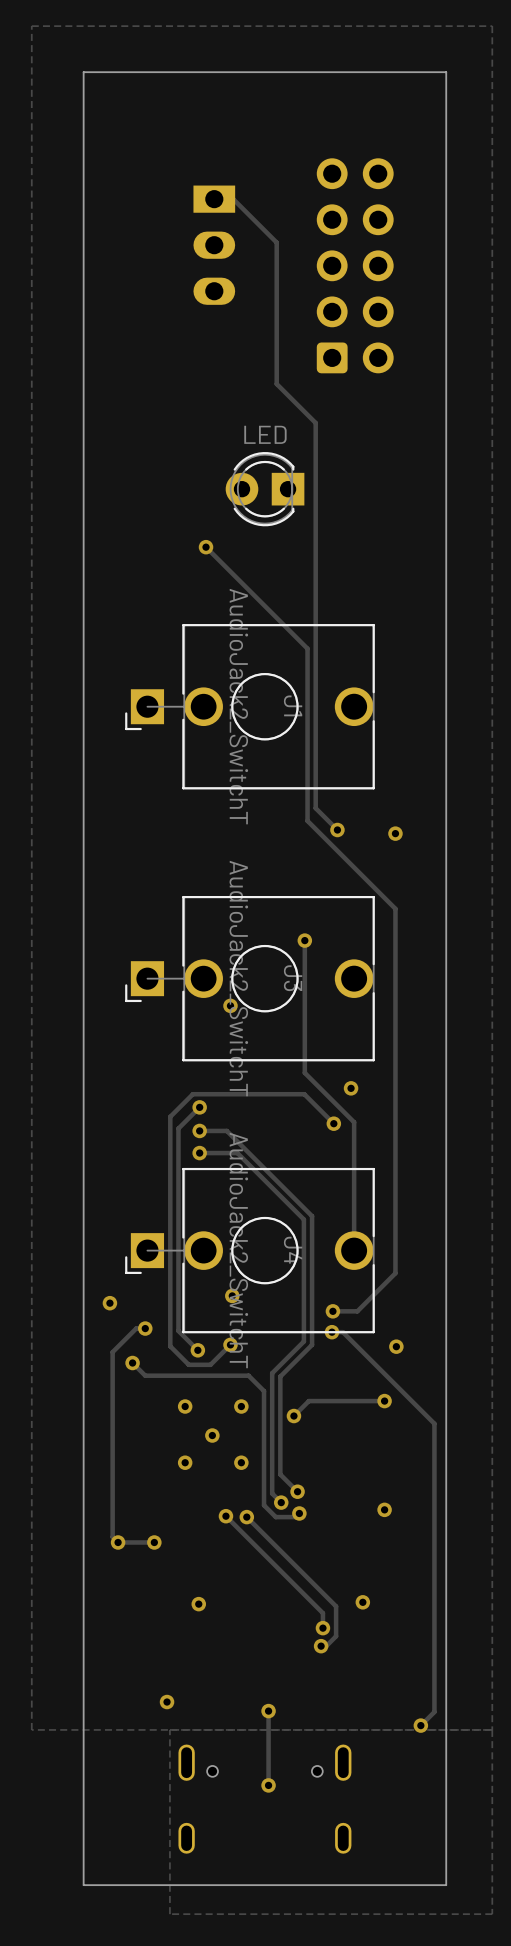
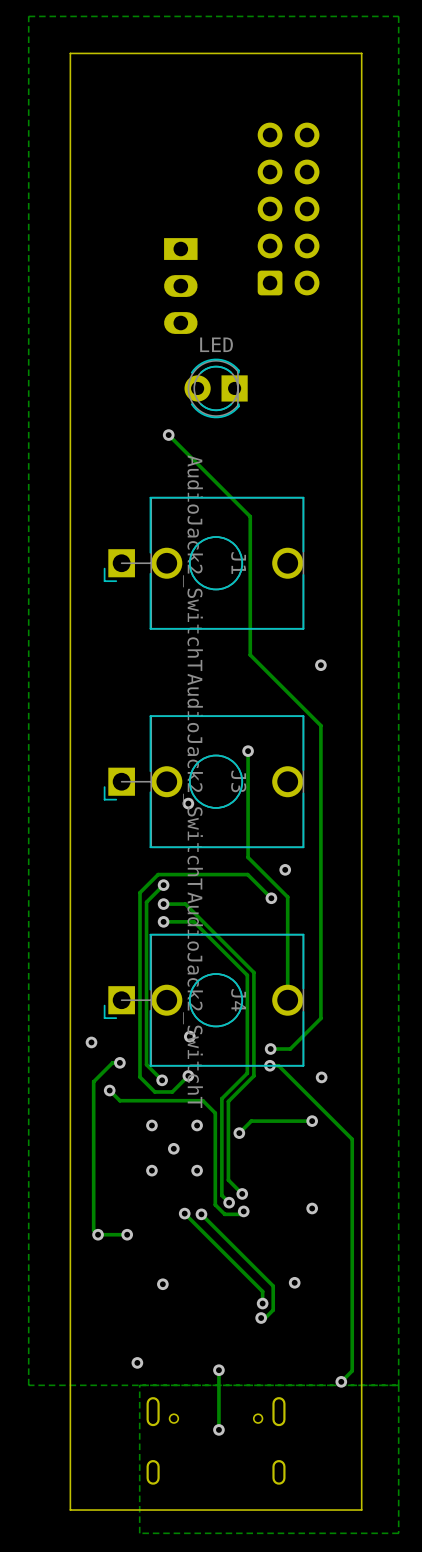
track: (214, 199) (233, 199) (276, 242) (276, 384) (315, 422) (315, 808) (337, 830) -> none
part position: (214, 245) -> (180, 286)
via: (337, 830) -> none

